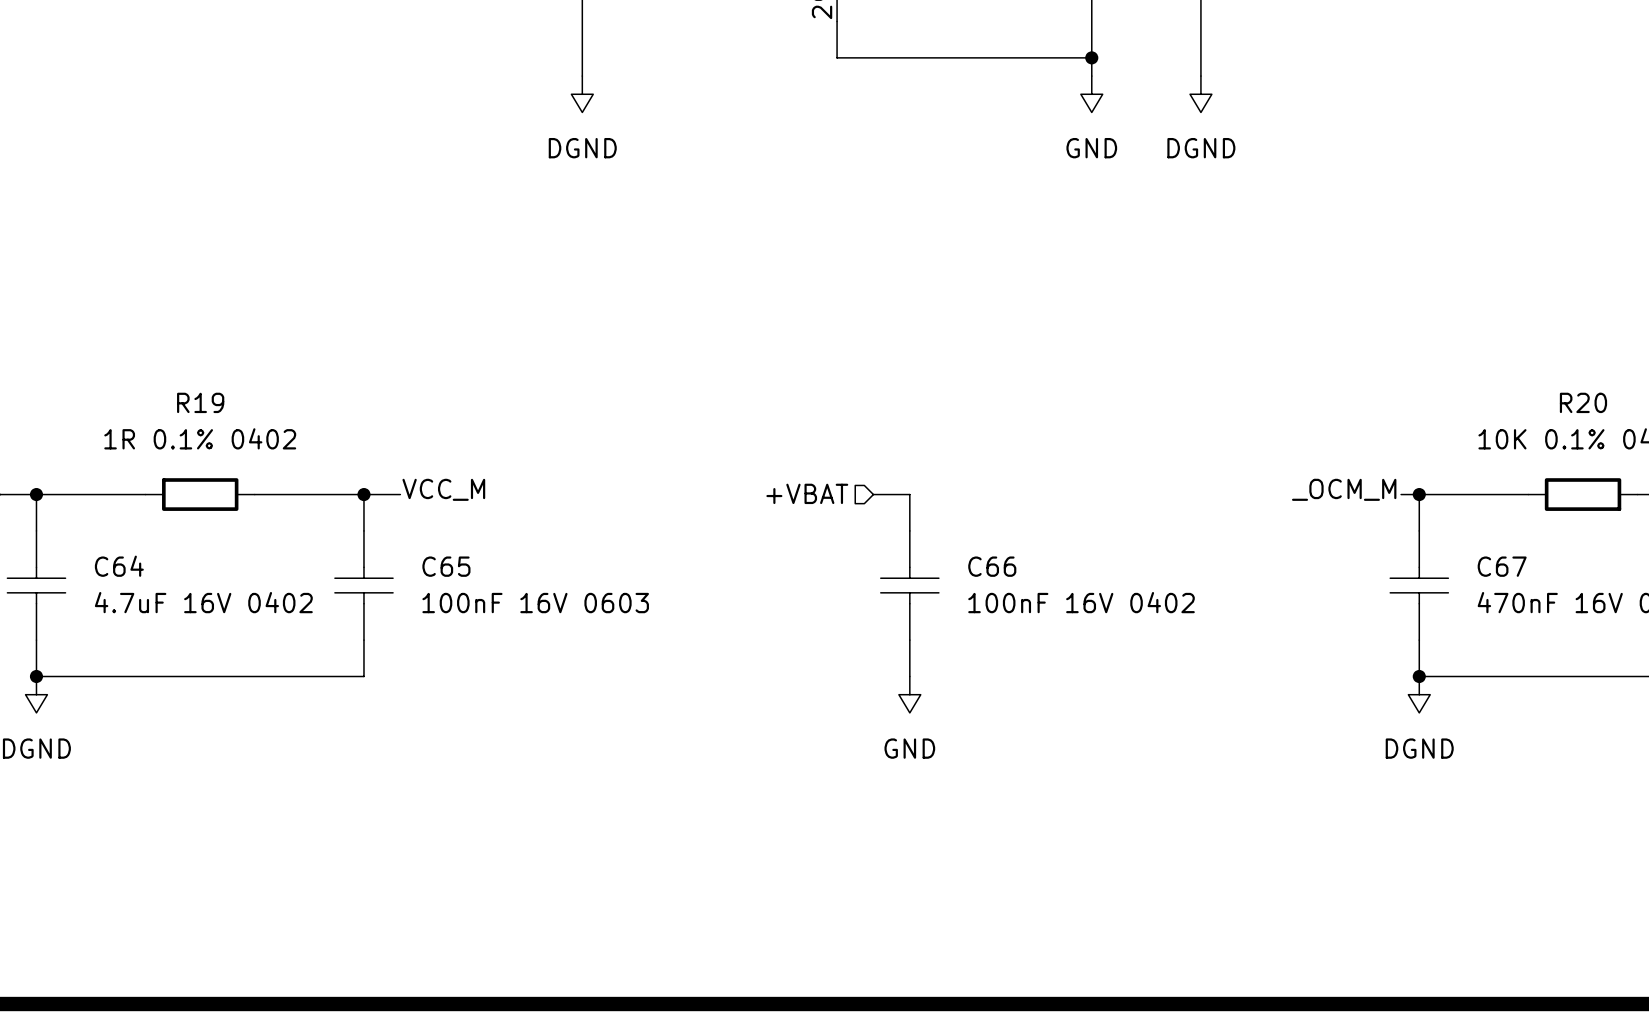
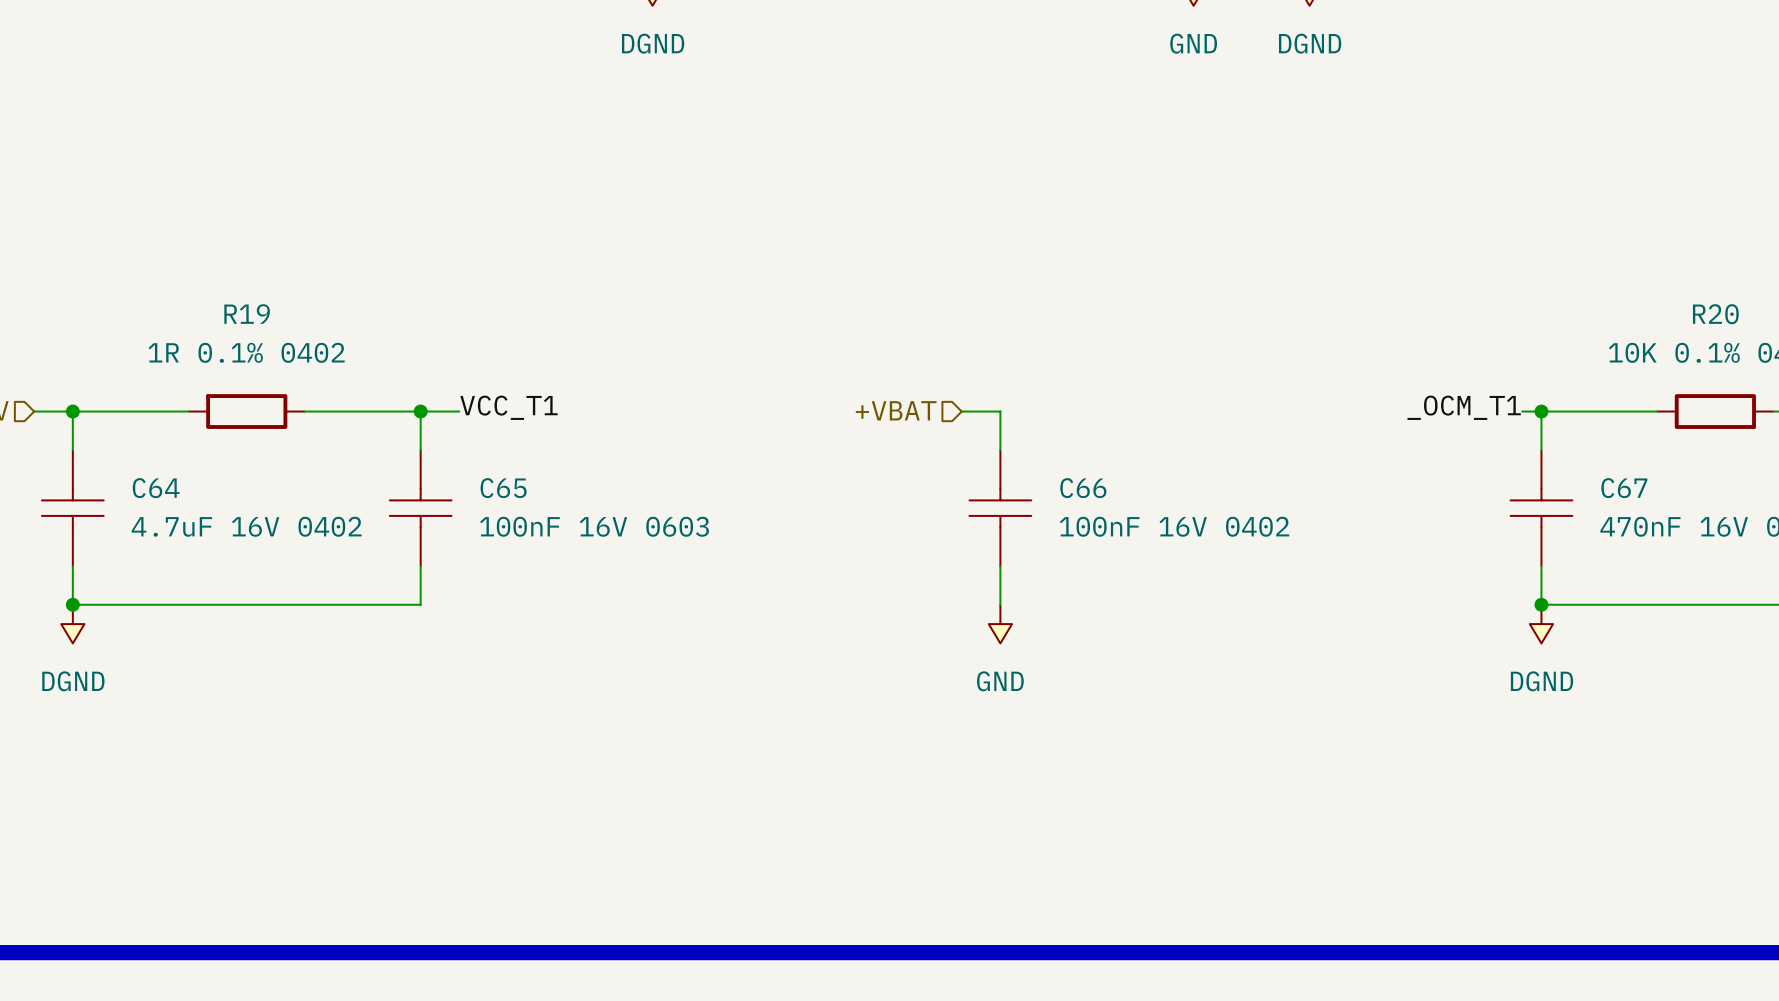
label: VCC_M (443, 489) -> VCC_T1 (509, 407)
label: _OCM_M (1344, 489) -> _OCM_T1 (1464, 407)

